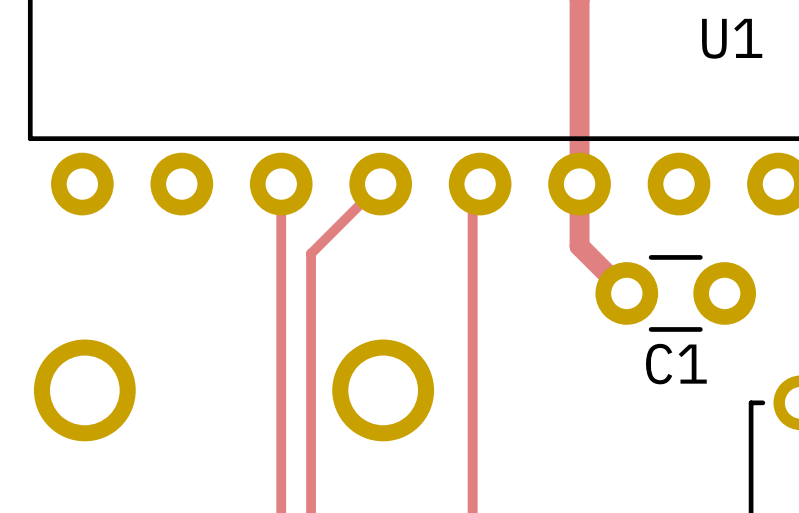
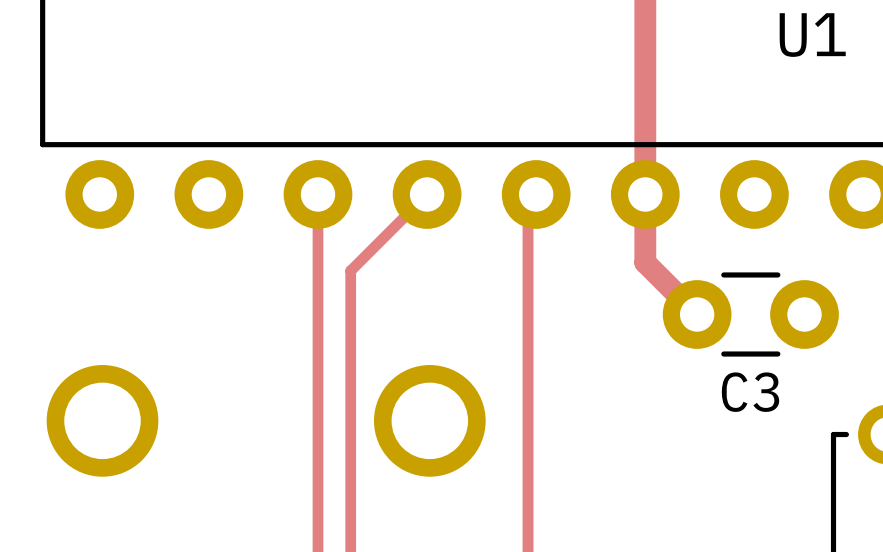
C1 name: C1 (676, 364) -> C3 (750, 392)

